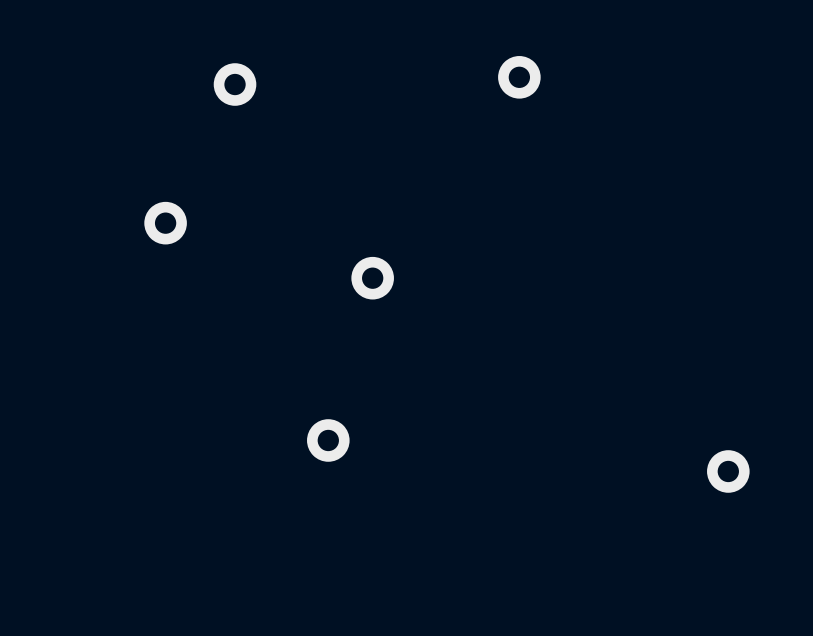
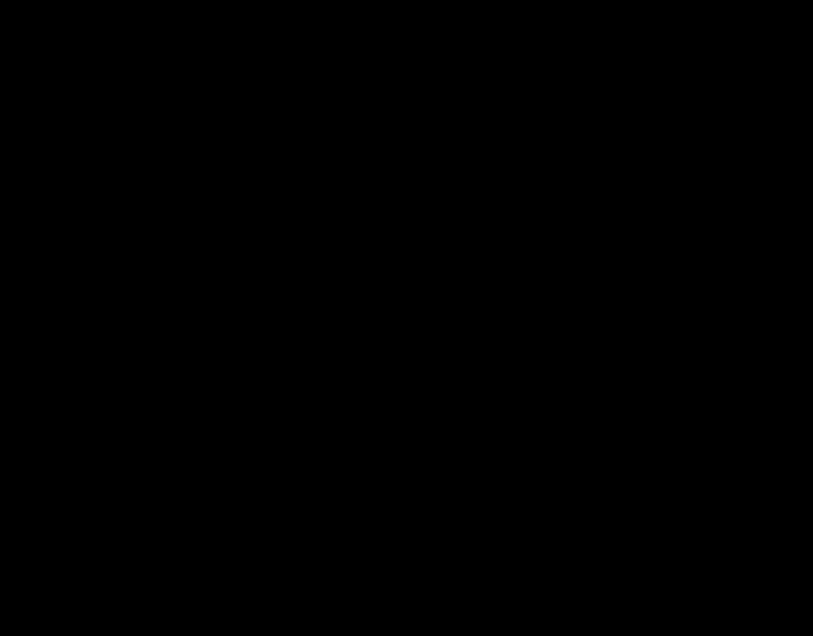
via: (519, 77) -> none
via: (235, 84) -> none
via: (165, 223) -> none
via: (372, 278) -> none
via: (328, 440) -> none
via: (728, 471) -> none

